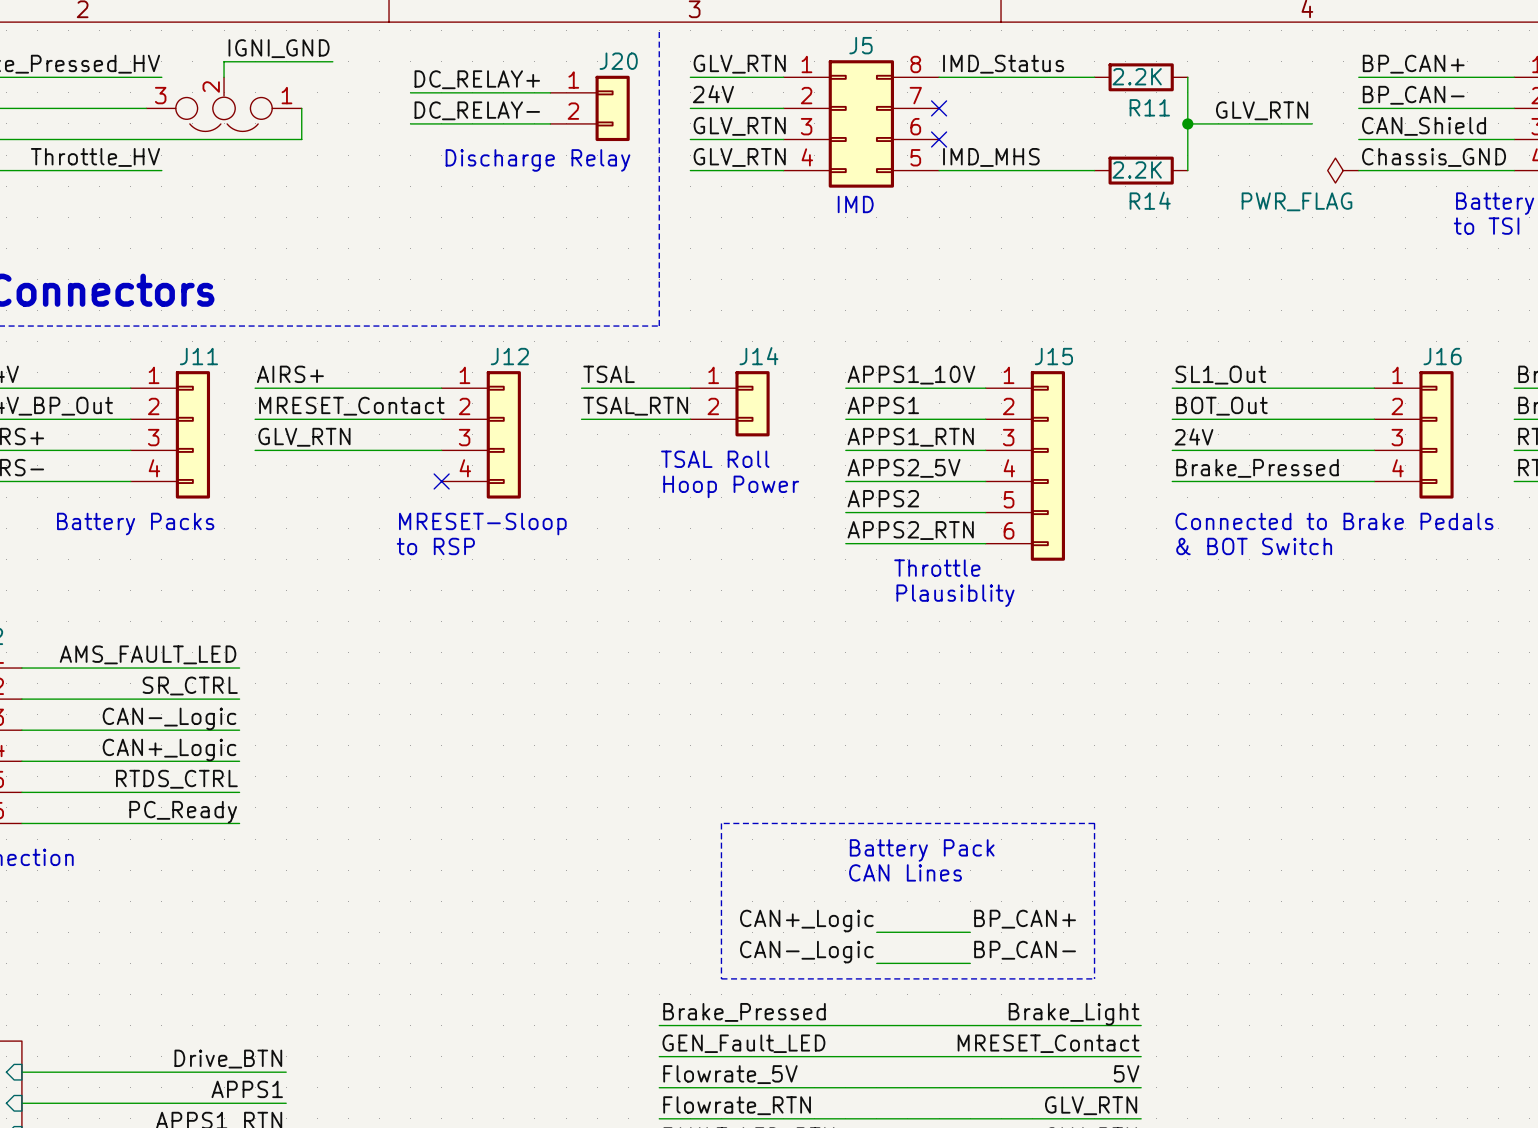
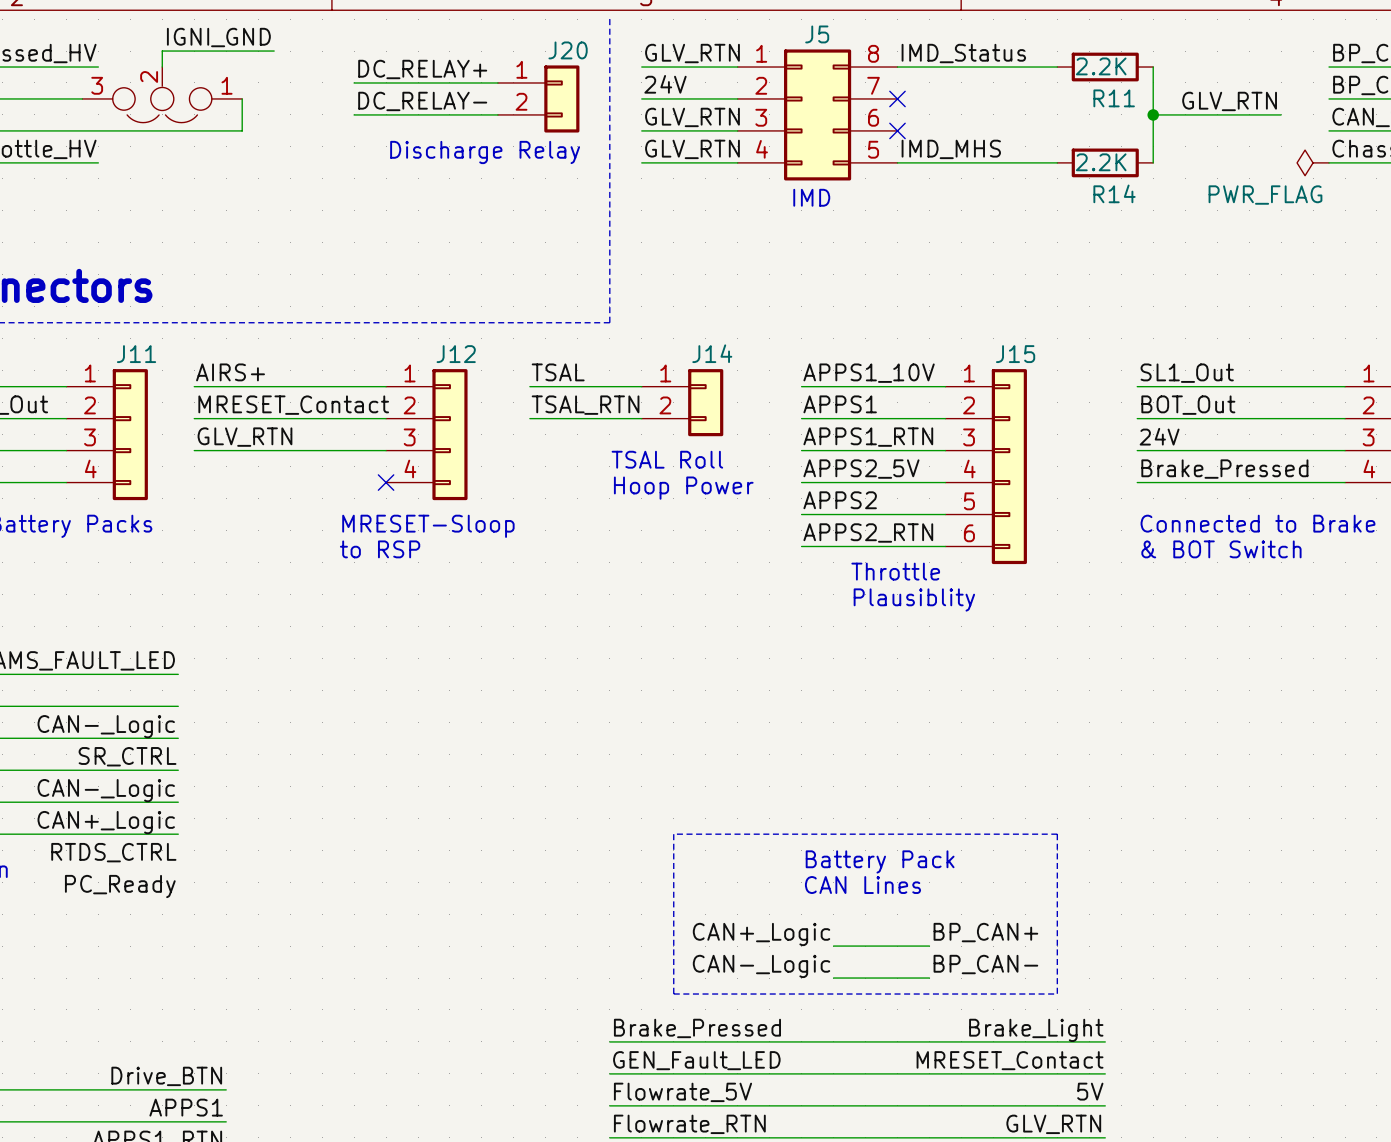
label: SR_CTRL (190, 685) -> none
label: CAN+_Logic (169, 750) -> SR_CTRL (127, 756)
label: RTDS_CTRL (176, 779) -> CAN-_Logic (106, 790)
label: PC_Ready (183, 812) -> CAN+_Logic (106, 822)
label: none -> RTDS_CTRL (113, 852)
label: none -> PC_Ready (120, 886)

